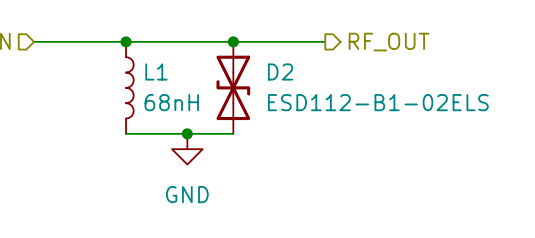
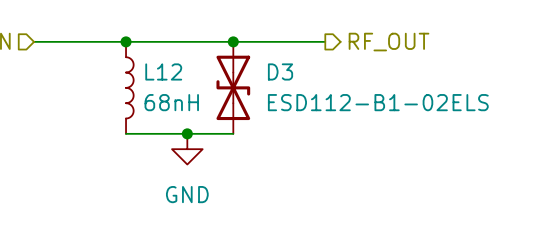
L1 name: L1 (156, 71) -> L12 (163, 71)
D2 name: D2 (280, 71) -> D3 (280, 71)

